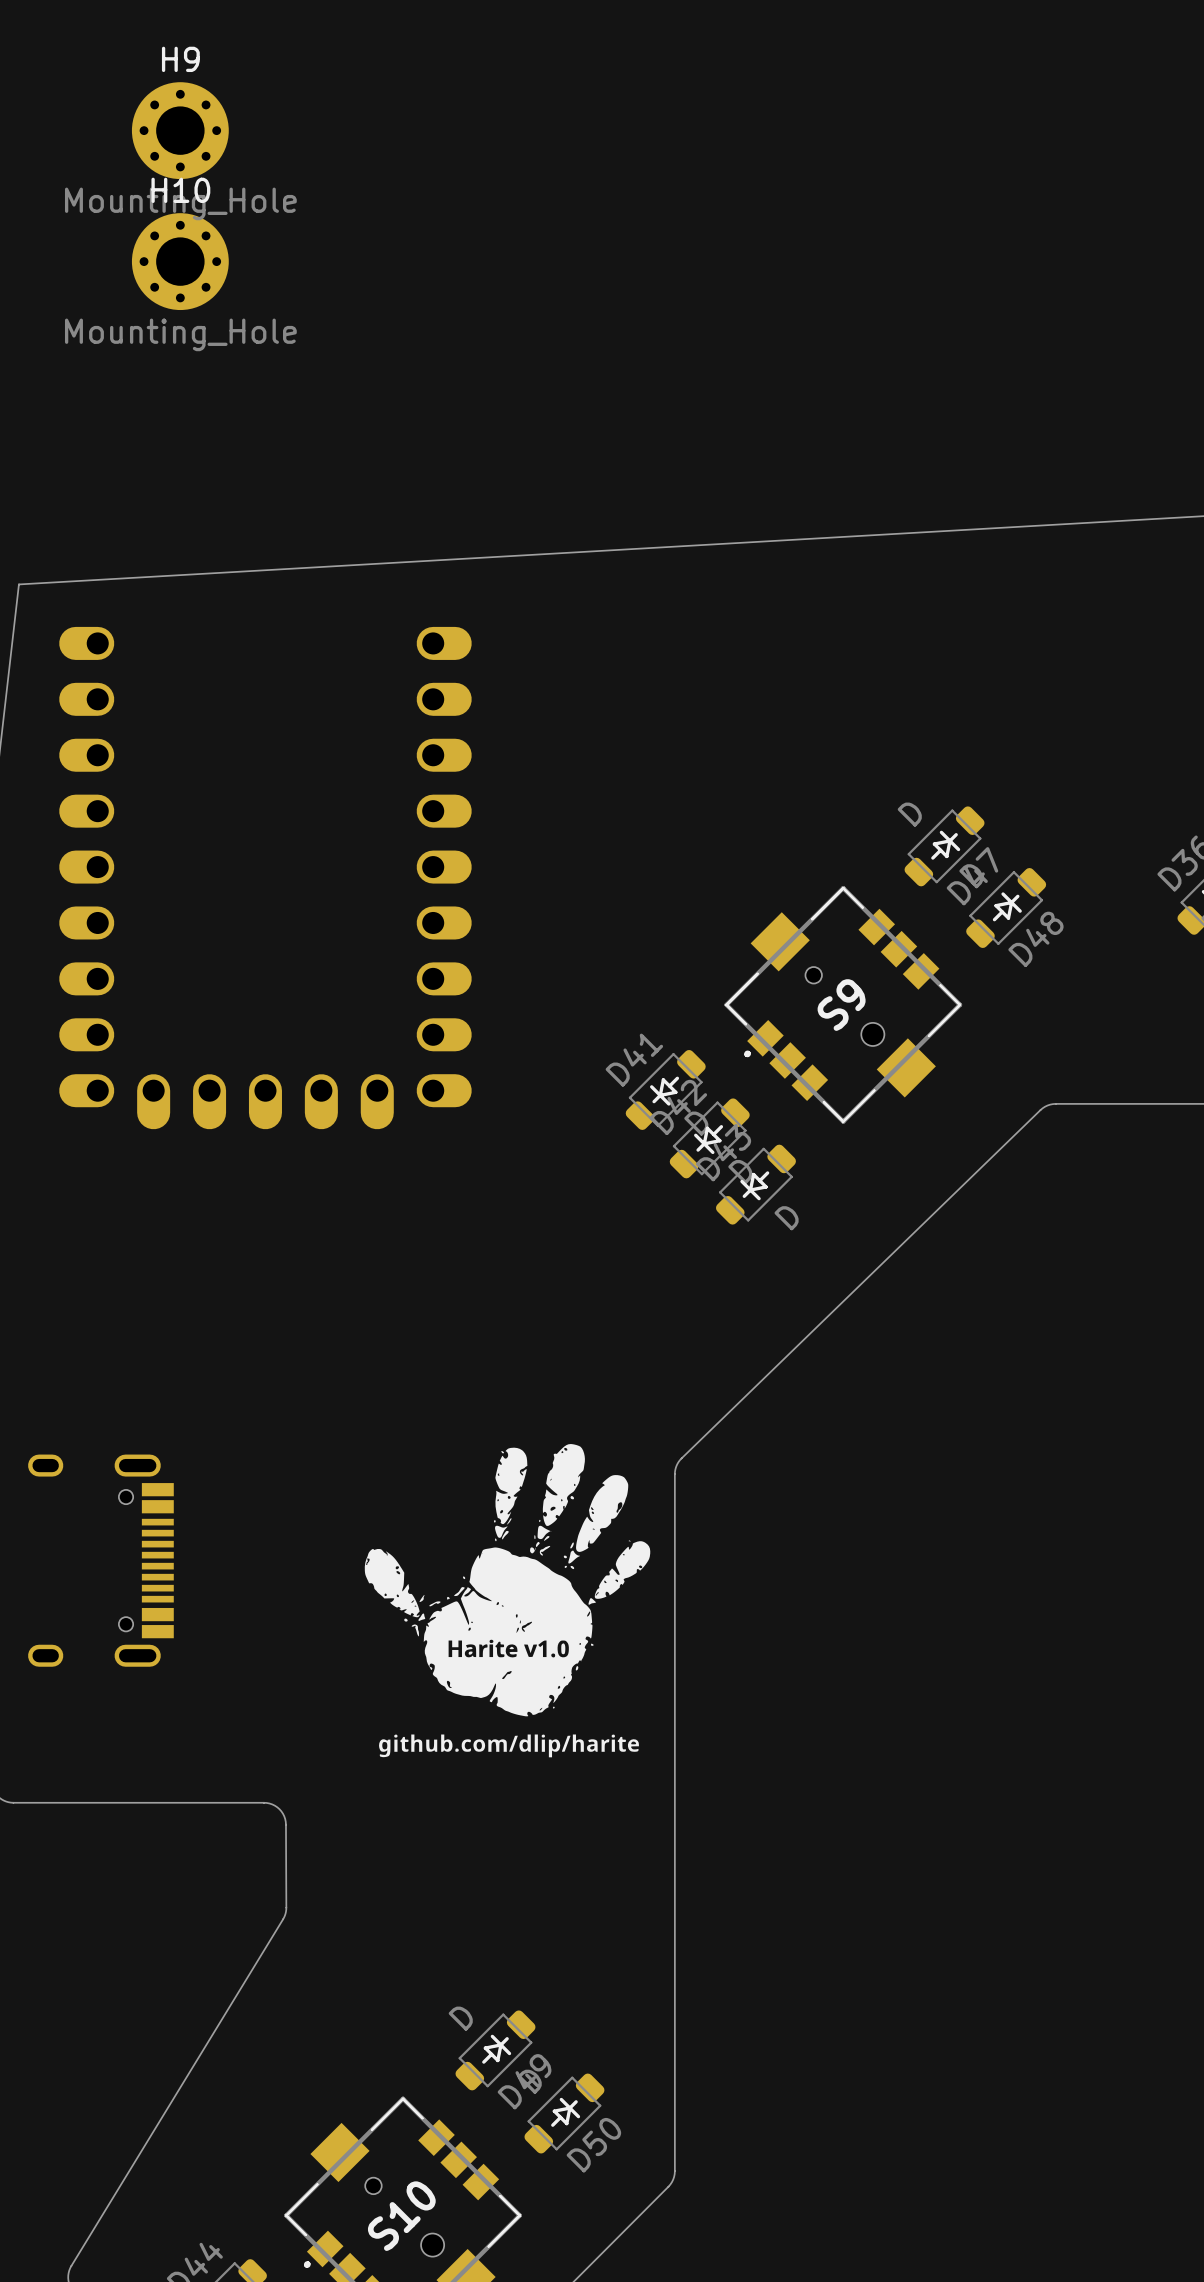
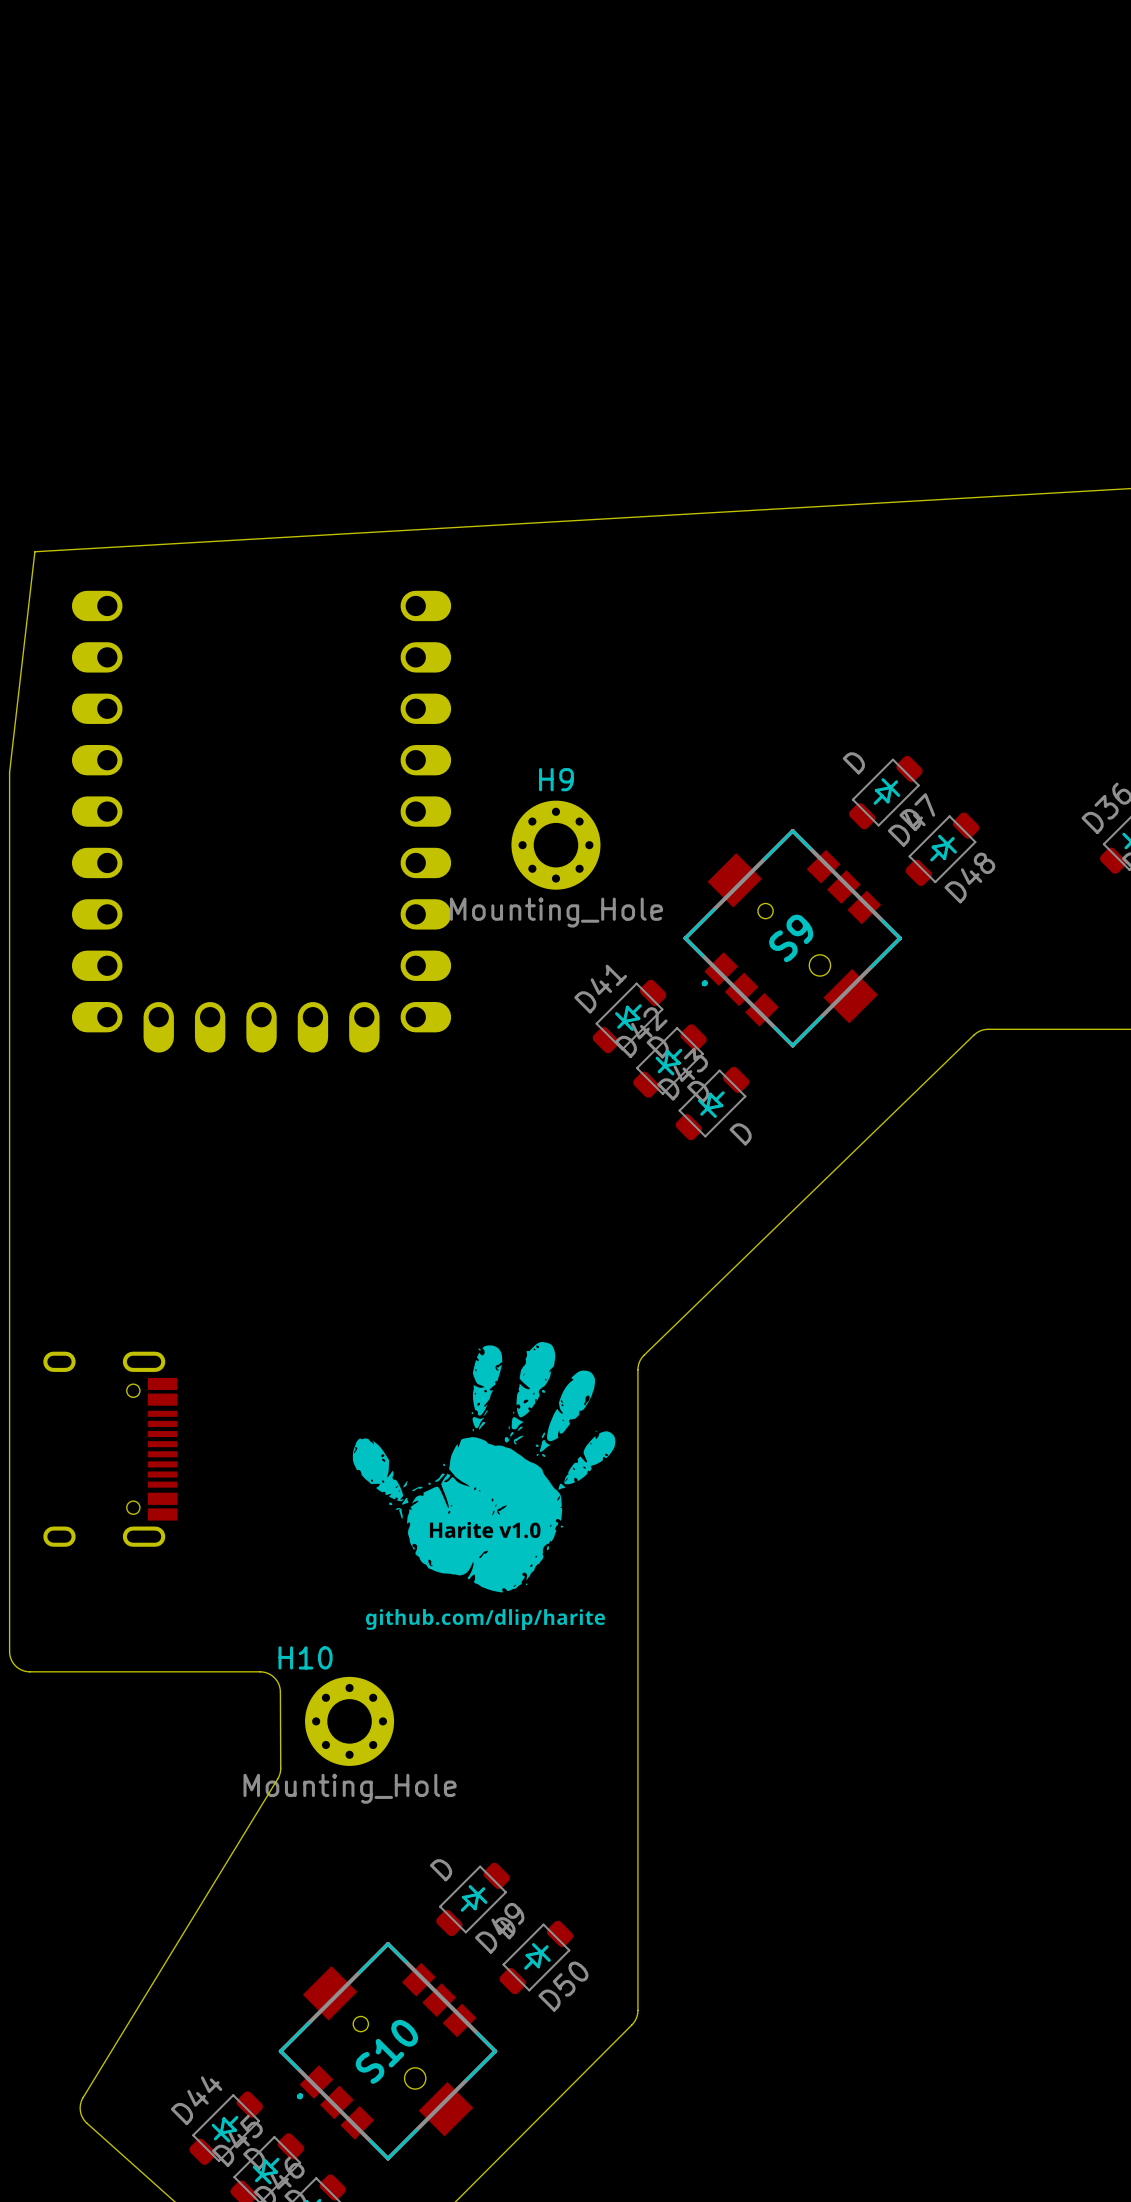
H9 position: (180, 130) -> (555, 845)
H10 name position: H10 (180, 190) -> H10 (305, 1657)
H10 position: (180, 261) -> (349, 1721)

